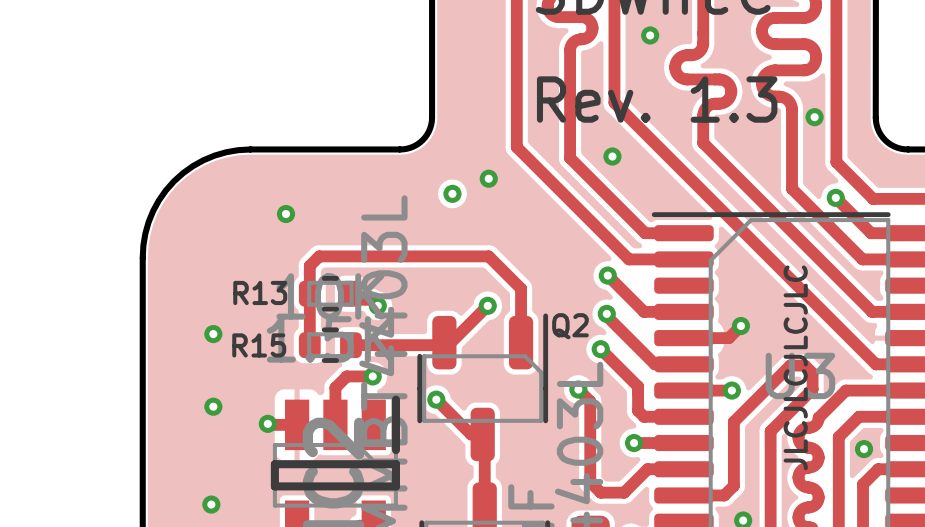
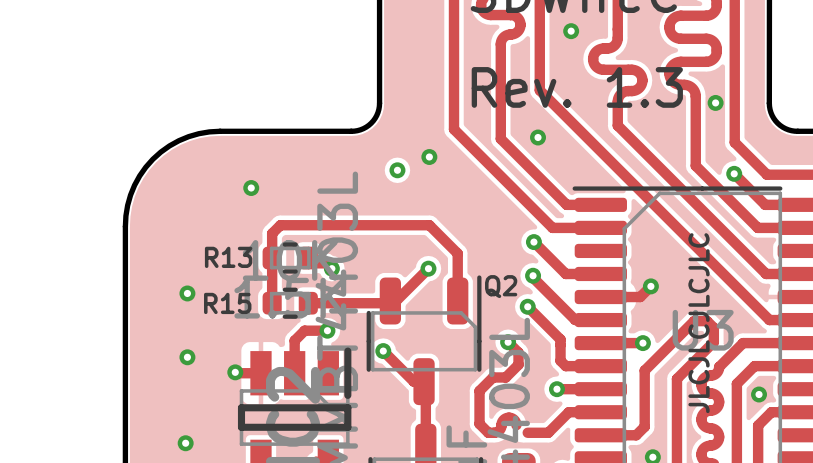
track: (590, 415) (590, 482) (600, 492) -> (518, 364) (505, 377) (492, 377) (479, 390) (479, 423) (488, 432) (497, 431) (501, 425)
track: none -> (501, 425) (503, 419) (508, 417) (514, 419) (516, 425)

